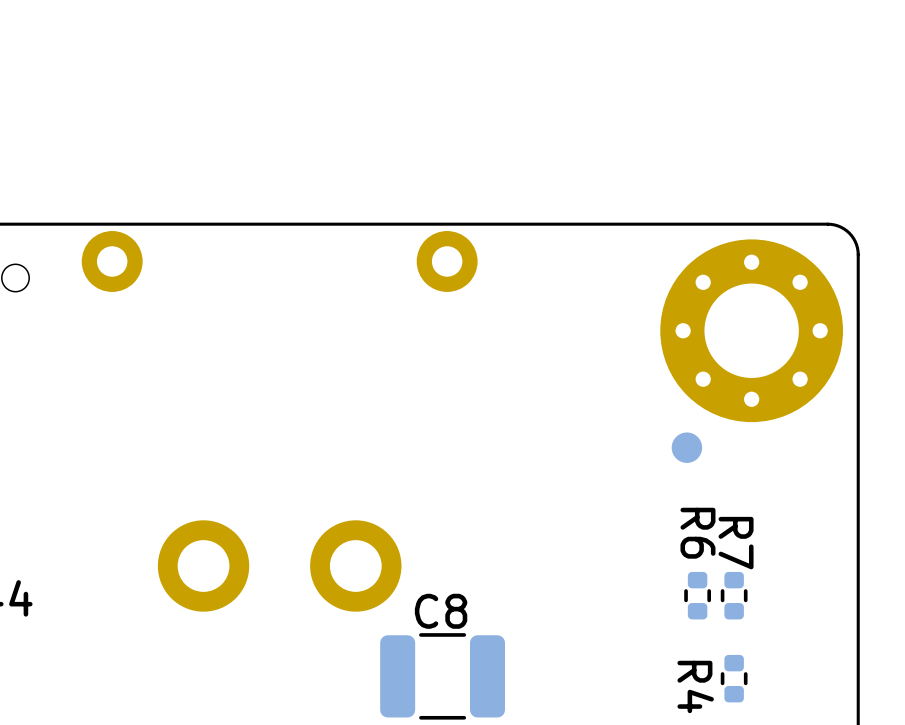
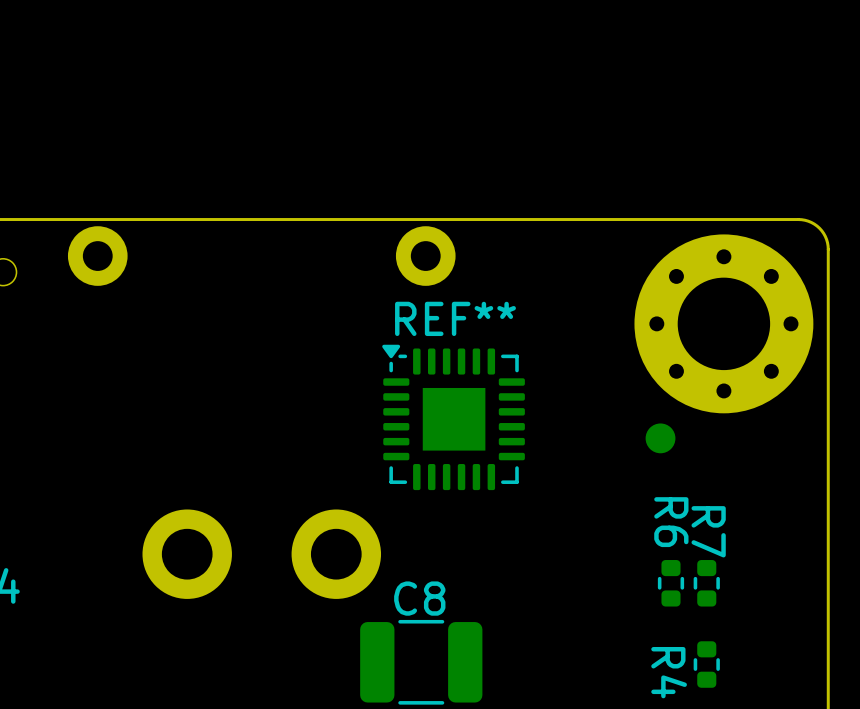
REF**: none -> (453, 417)

